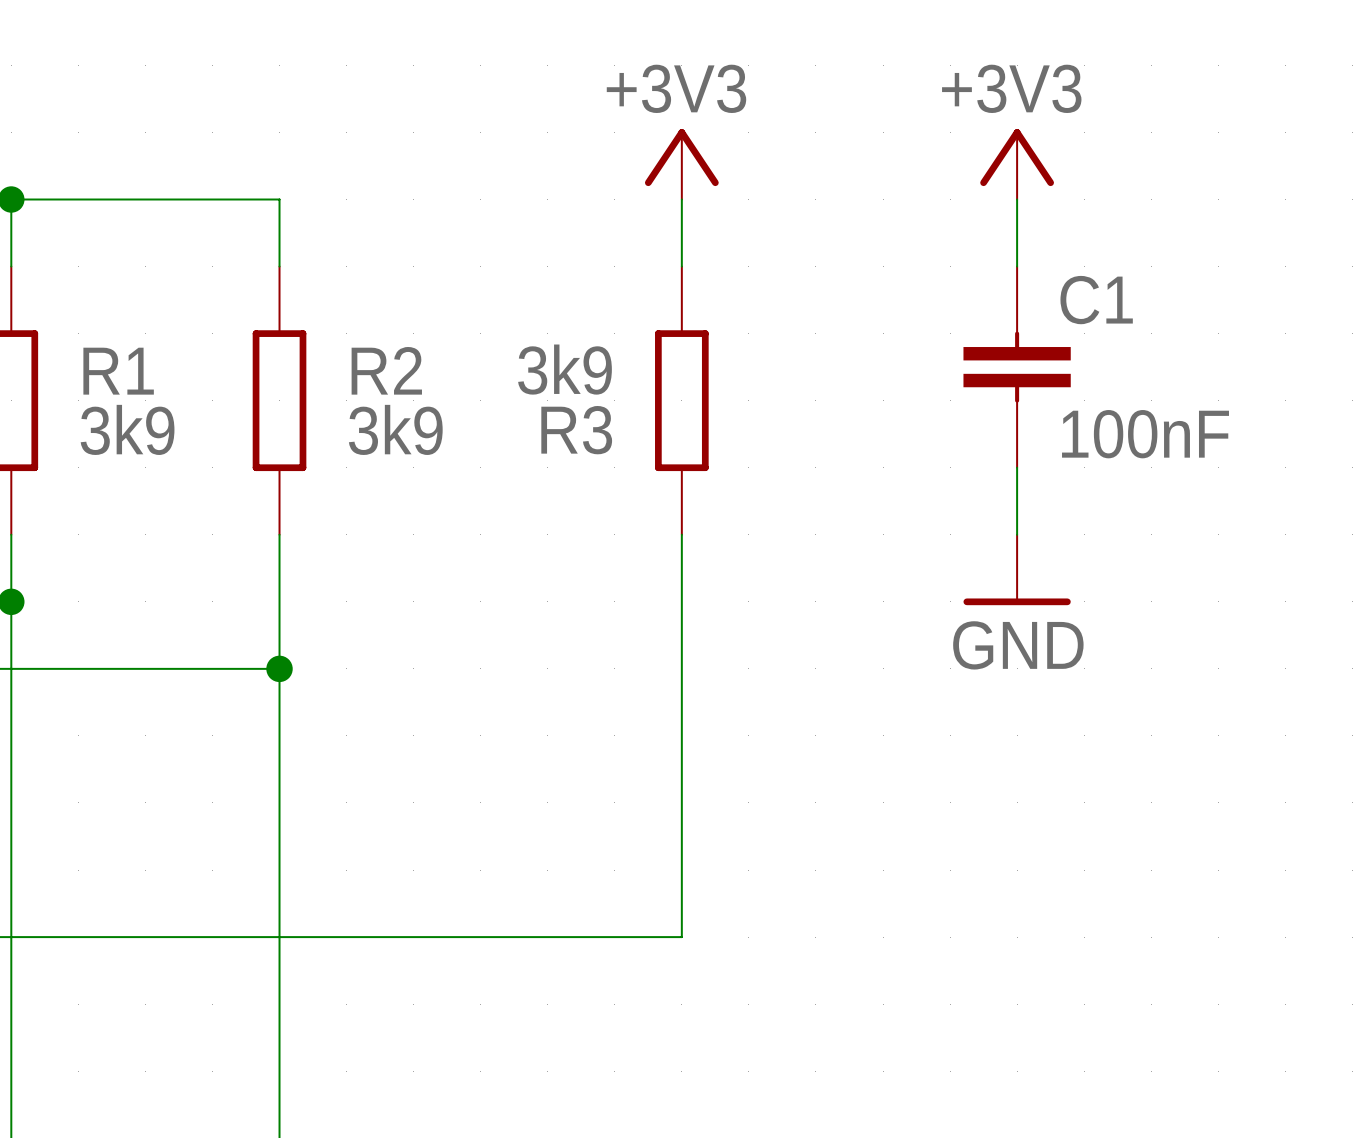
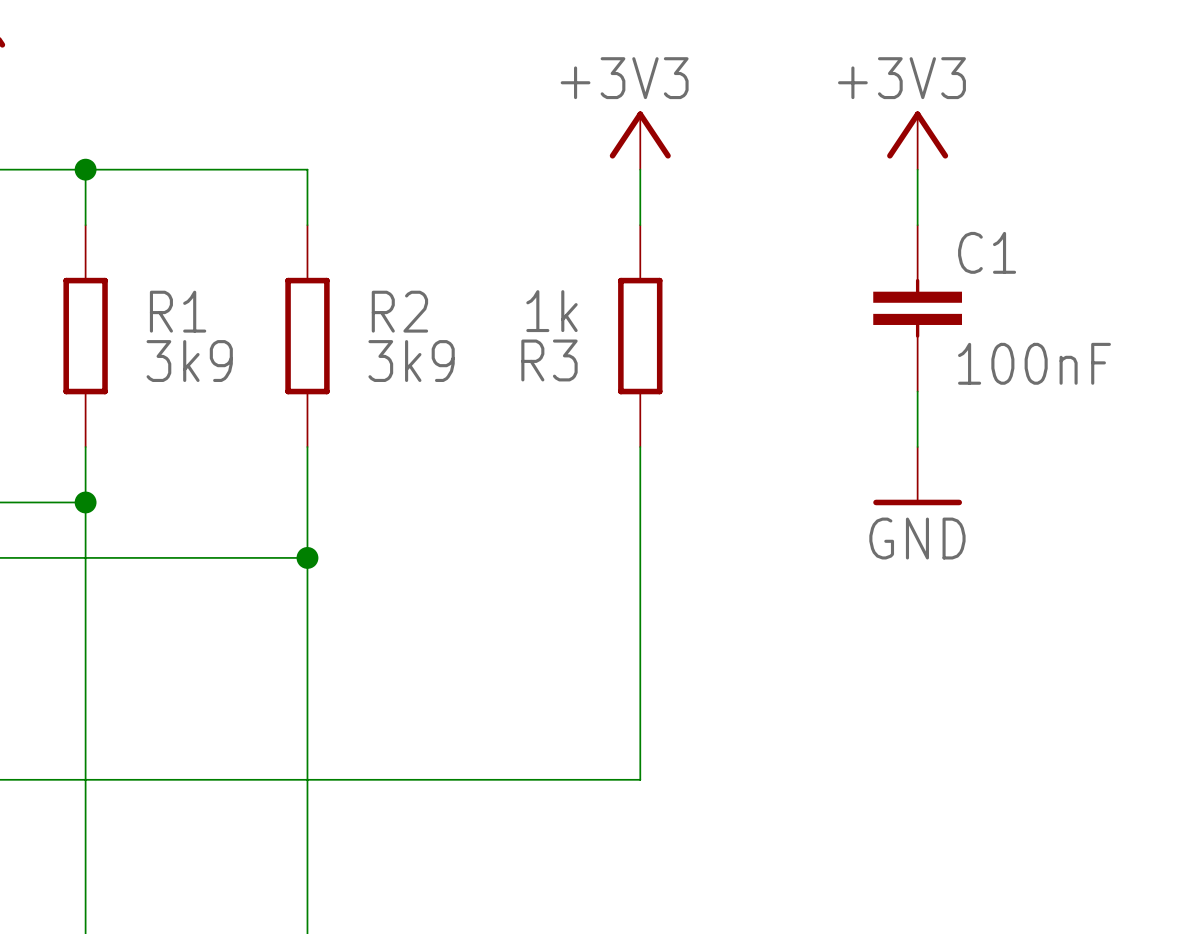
R3 value: 3k9 (565, 369) -> 1k (551, 311)

